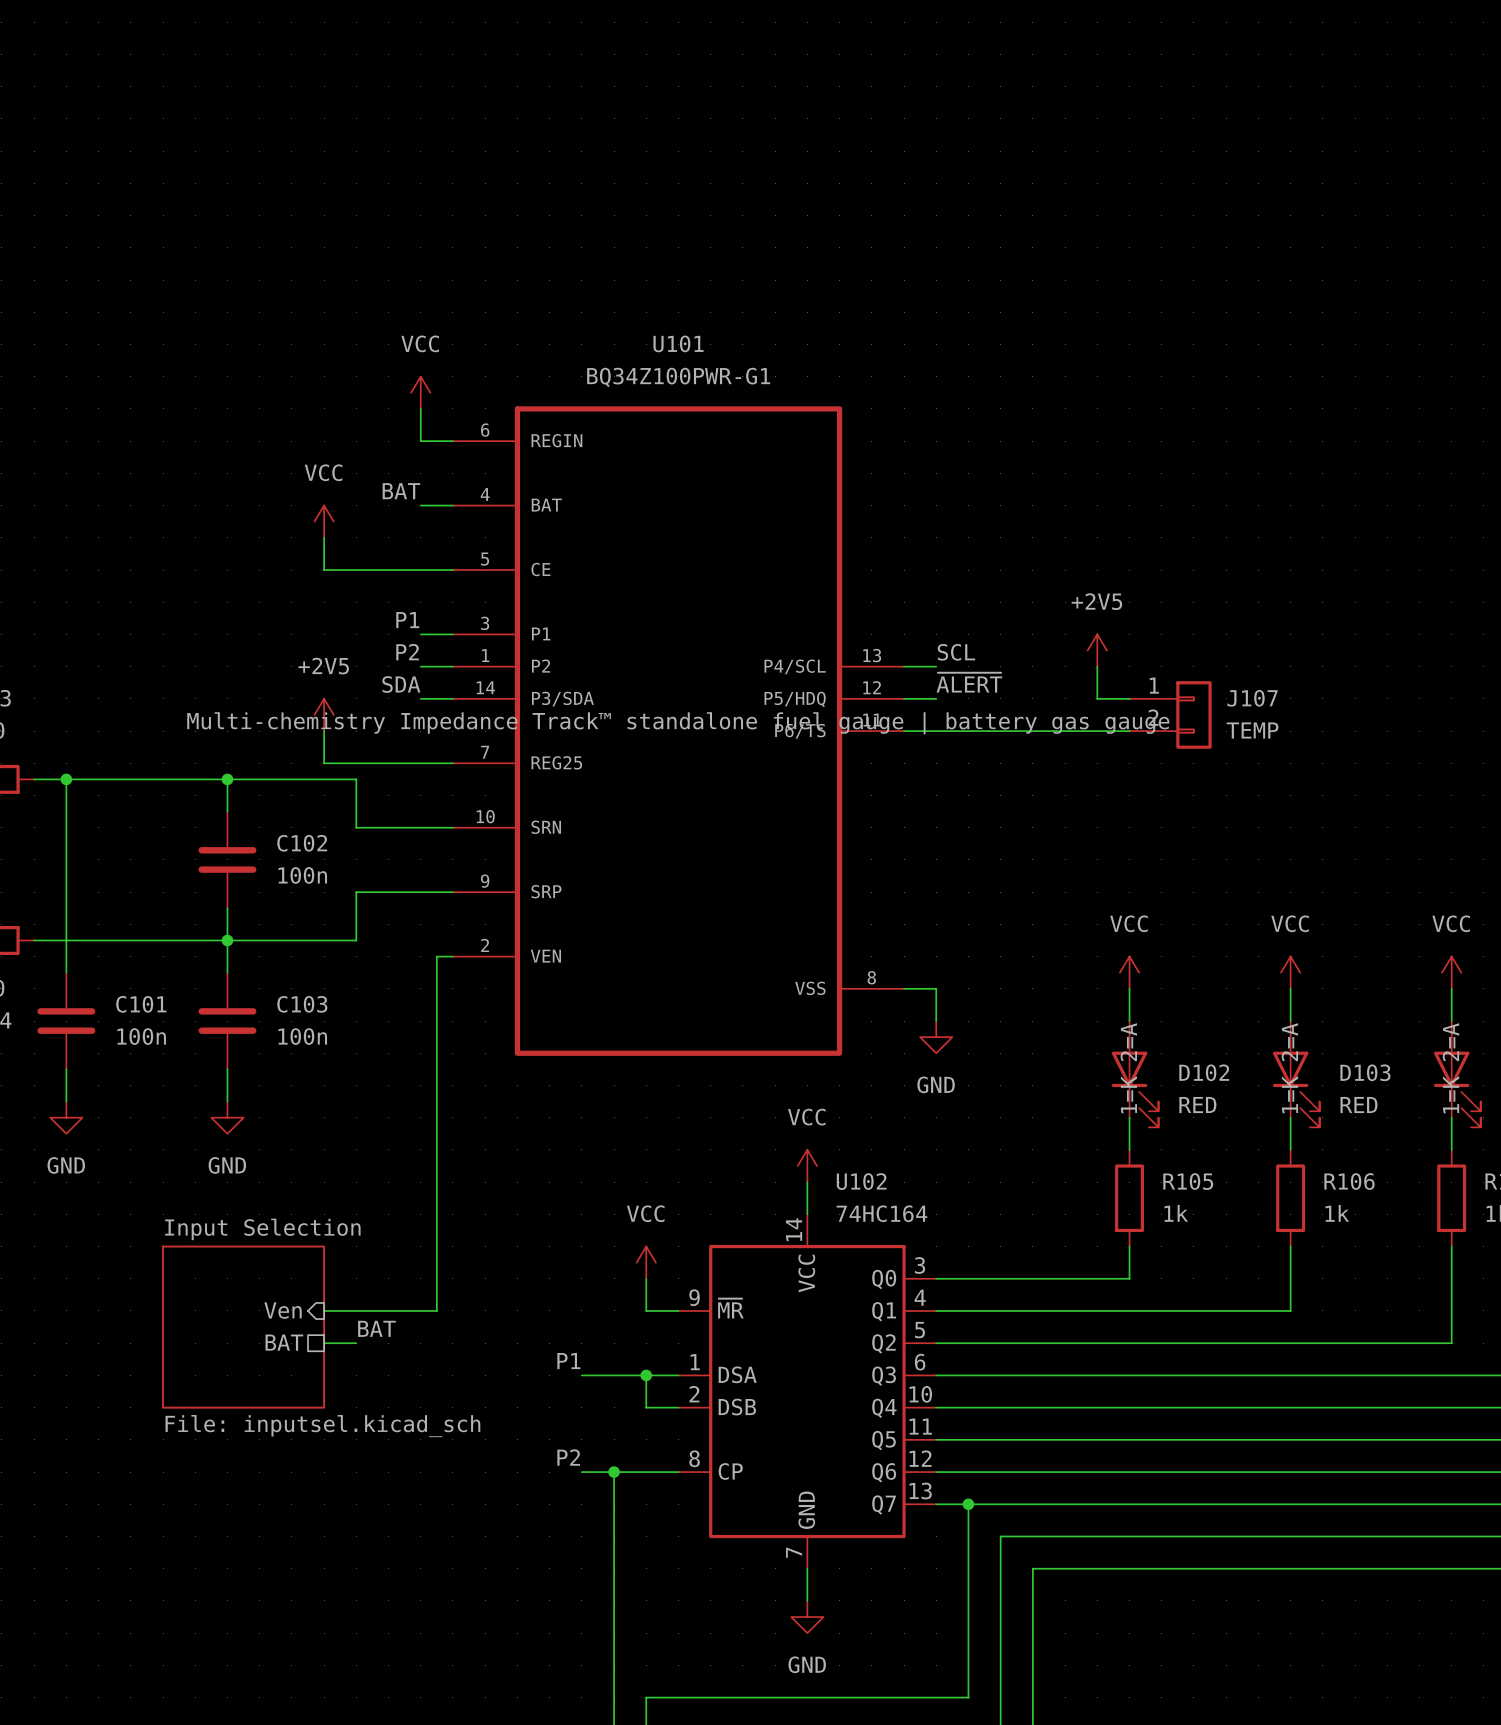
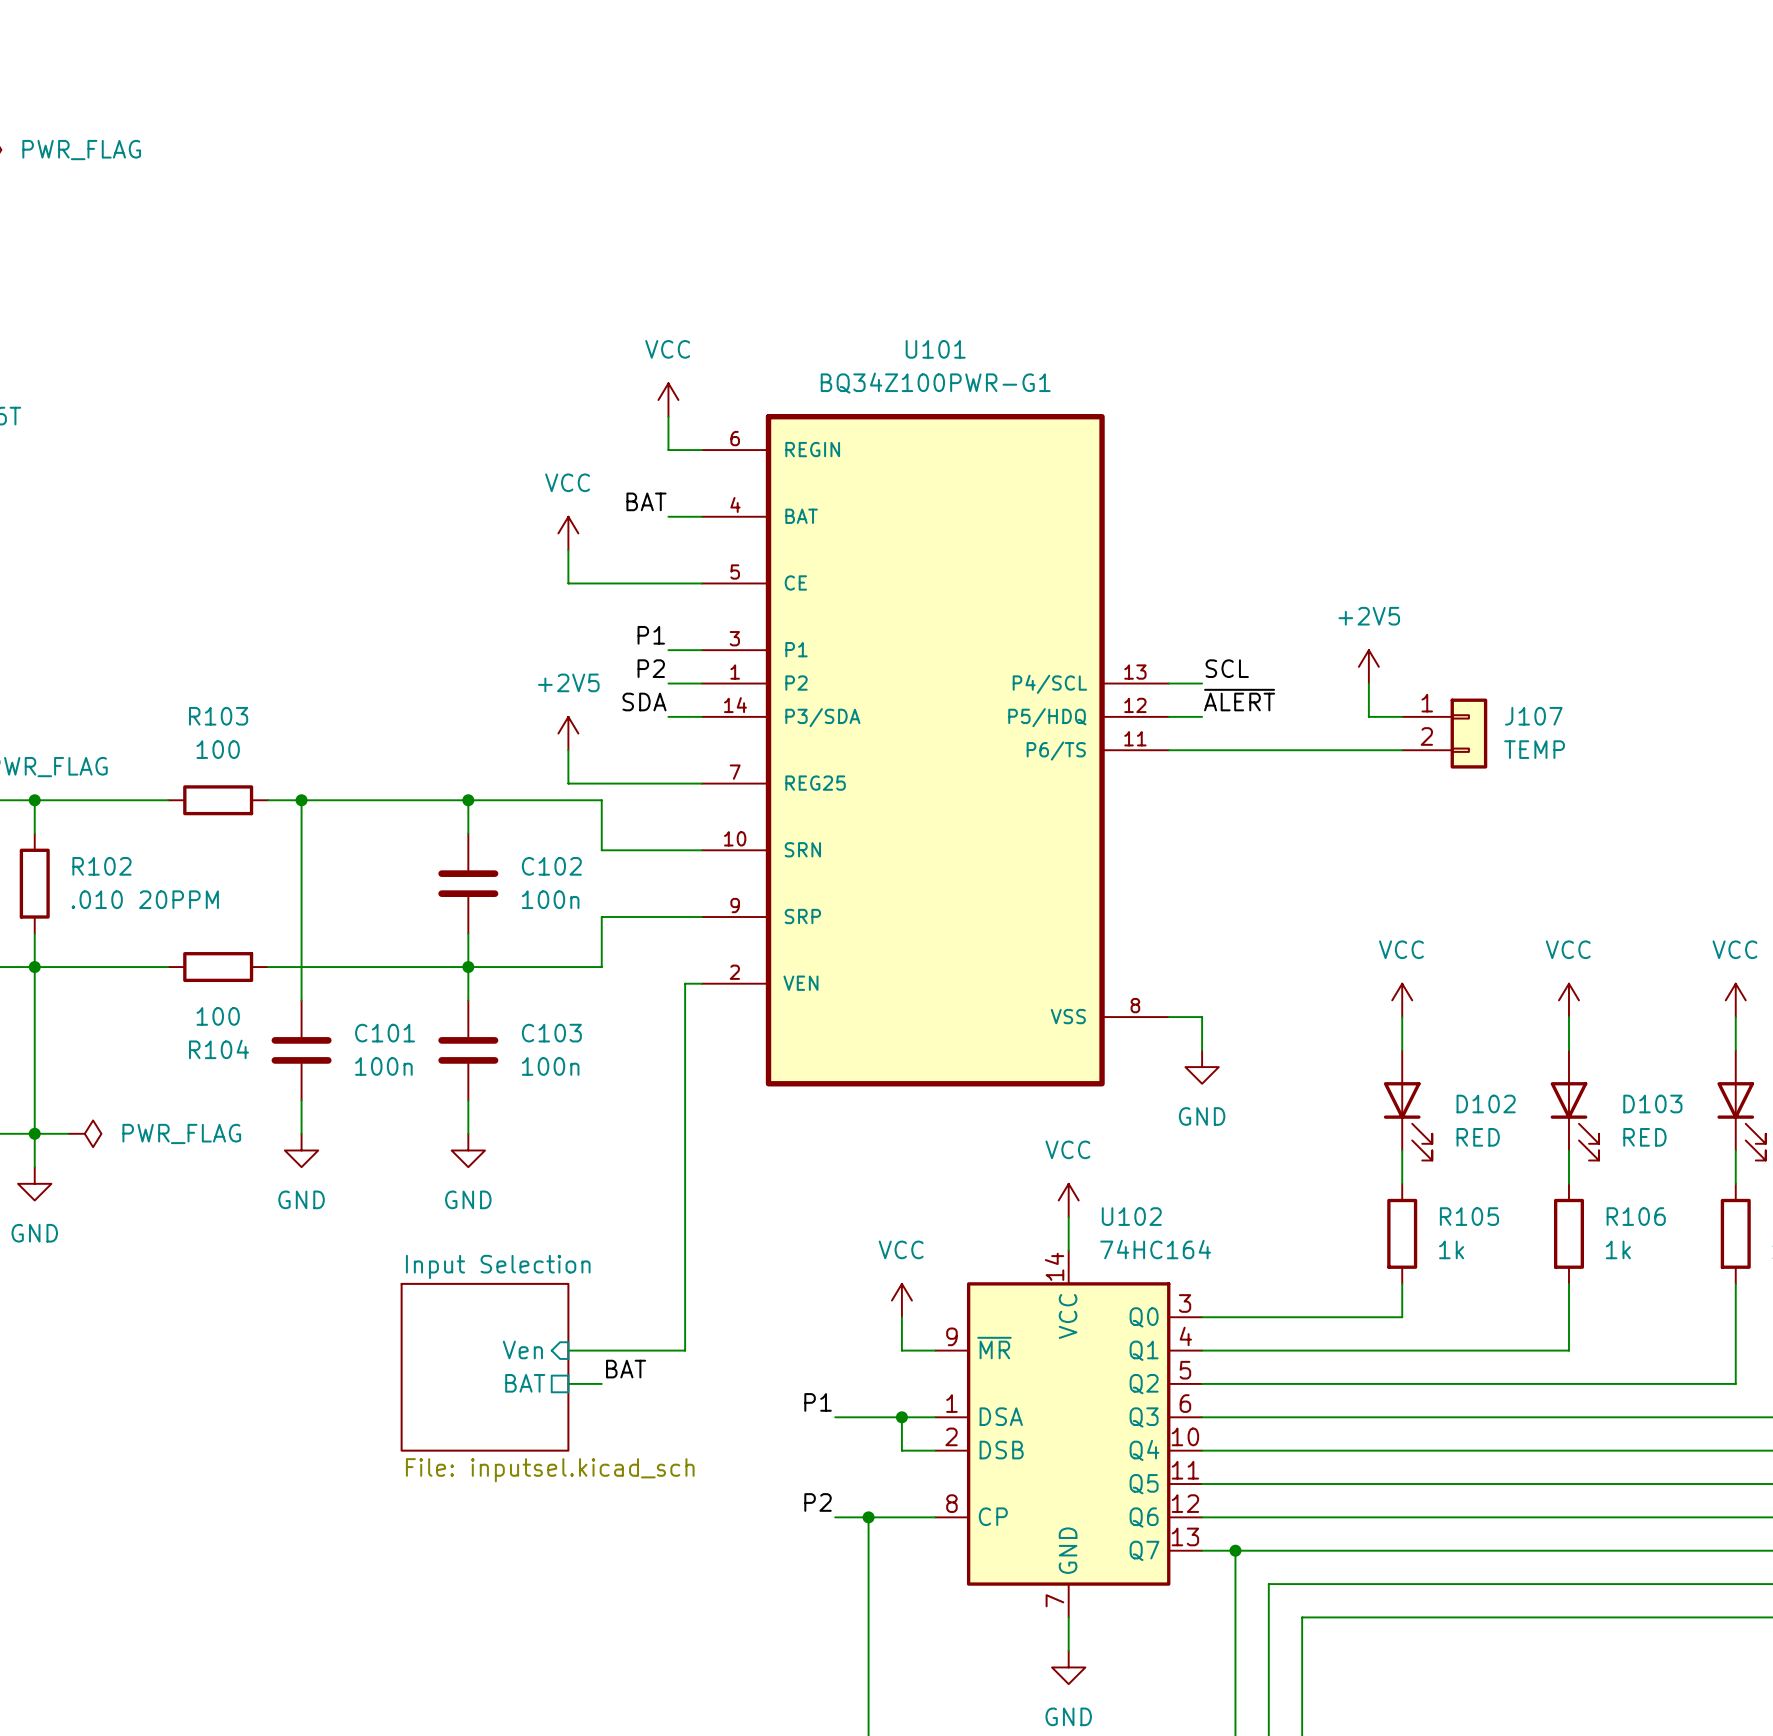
U101 text: Multi-chemistry Impedance Track™ standalone fuel gauge | battery gas gauge (678, 723) -> none
D102 text: 1=K 2=A (1128, 1068) -> none
D103 text: 1=K 2=A (1289, 1068) -> none
part text: 1=K 2=A (1450, 1068) -> none

